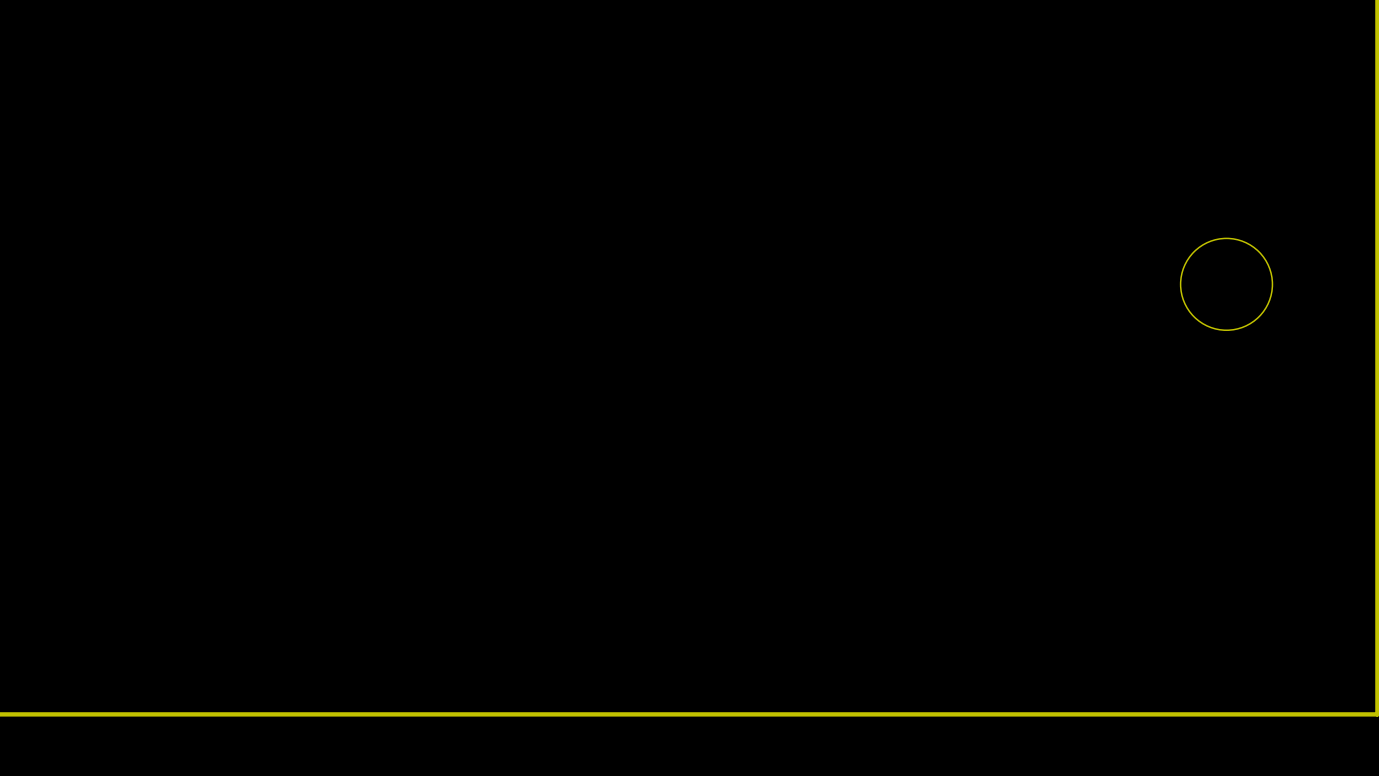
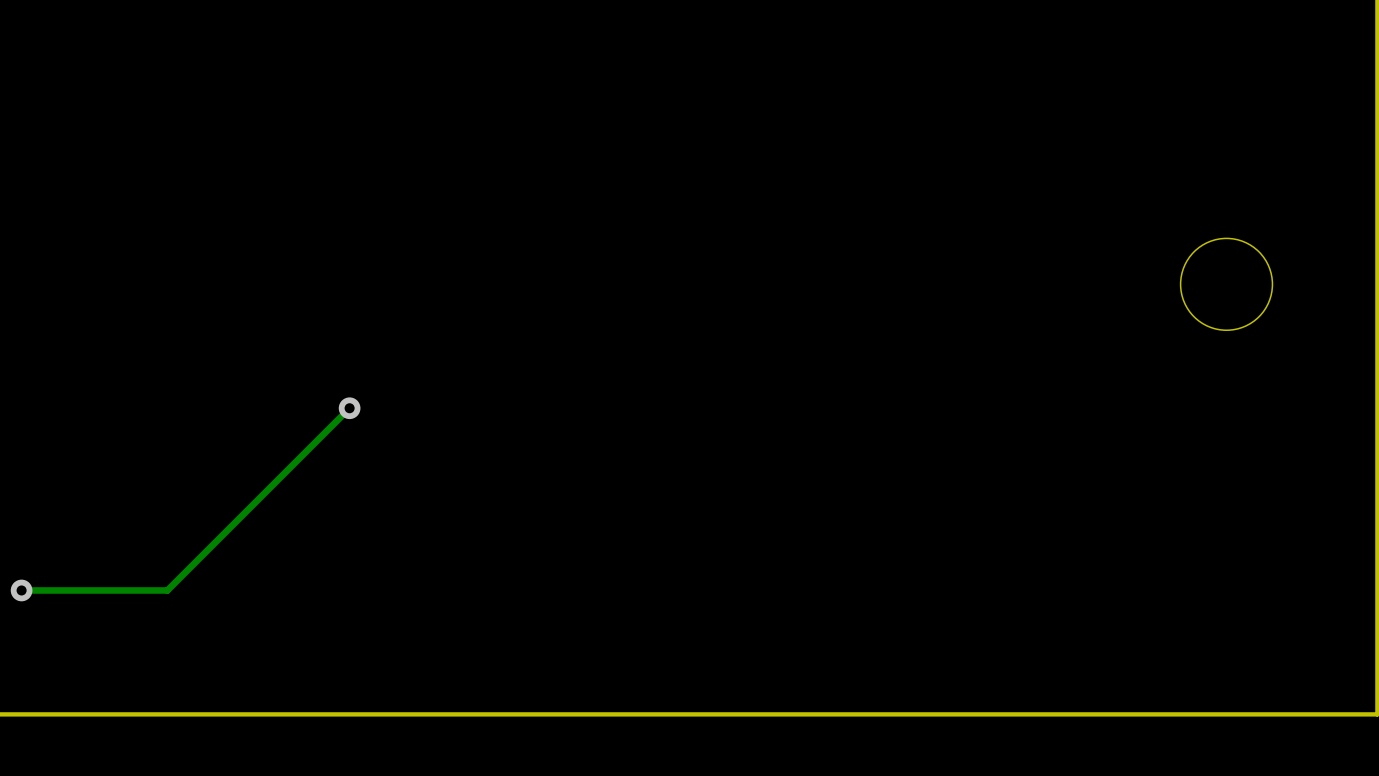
track: none -> (349, 408) (167, 590) (21, 590)
via: none -> (349, 408)
via: none -> (21, 590)

